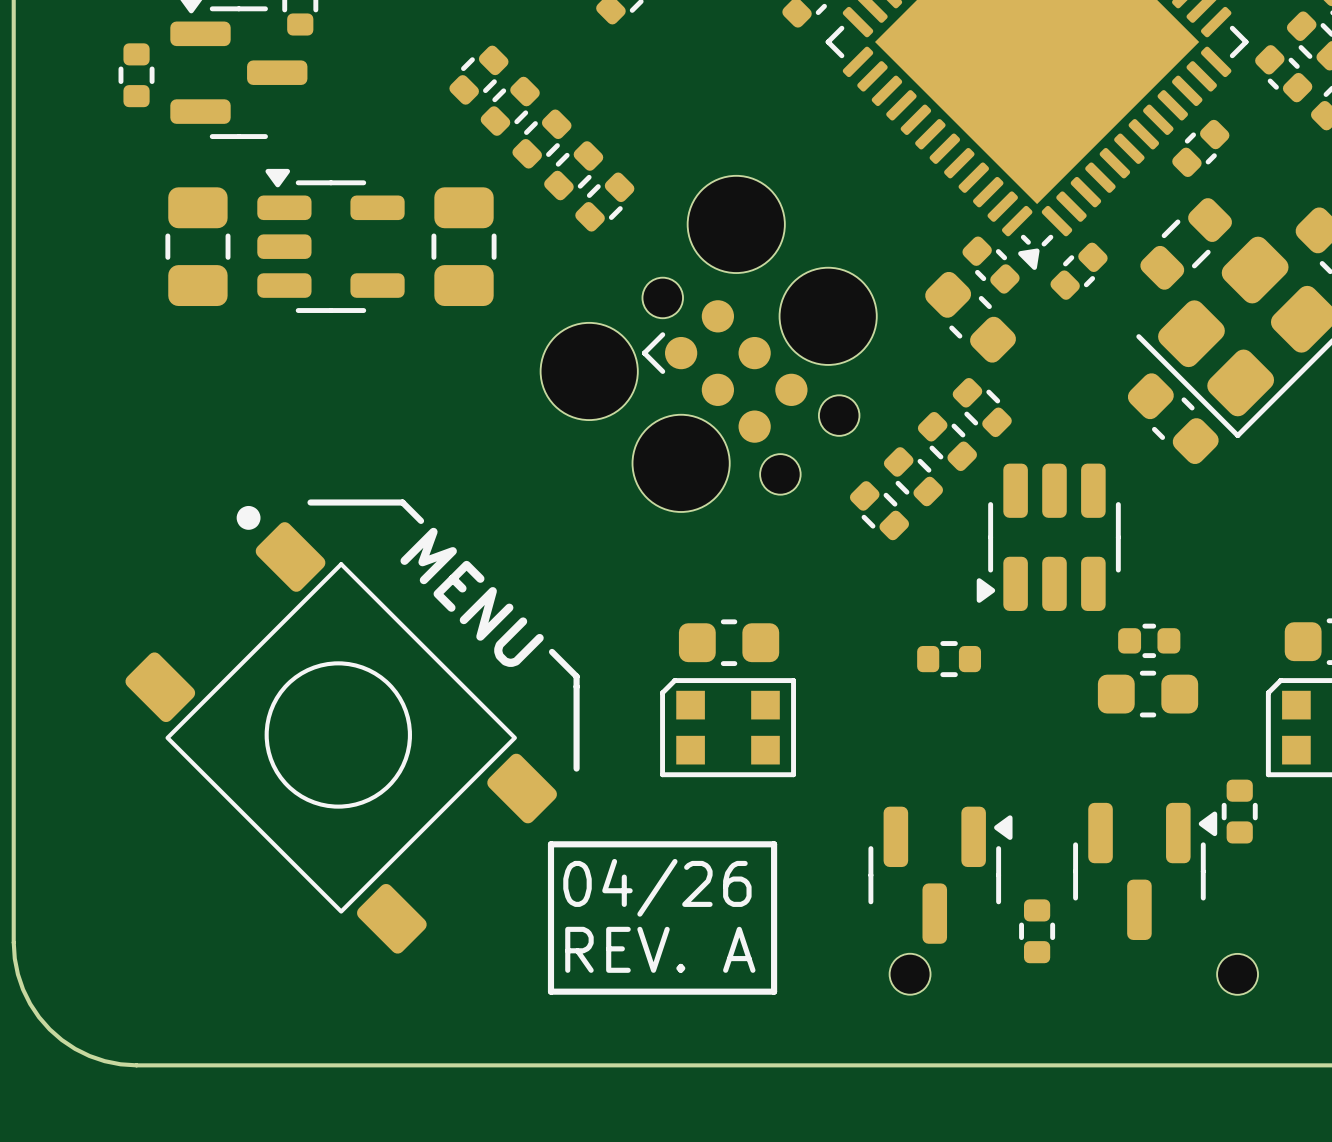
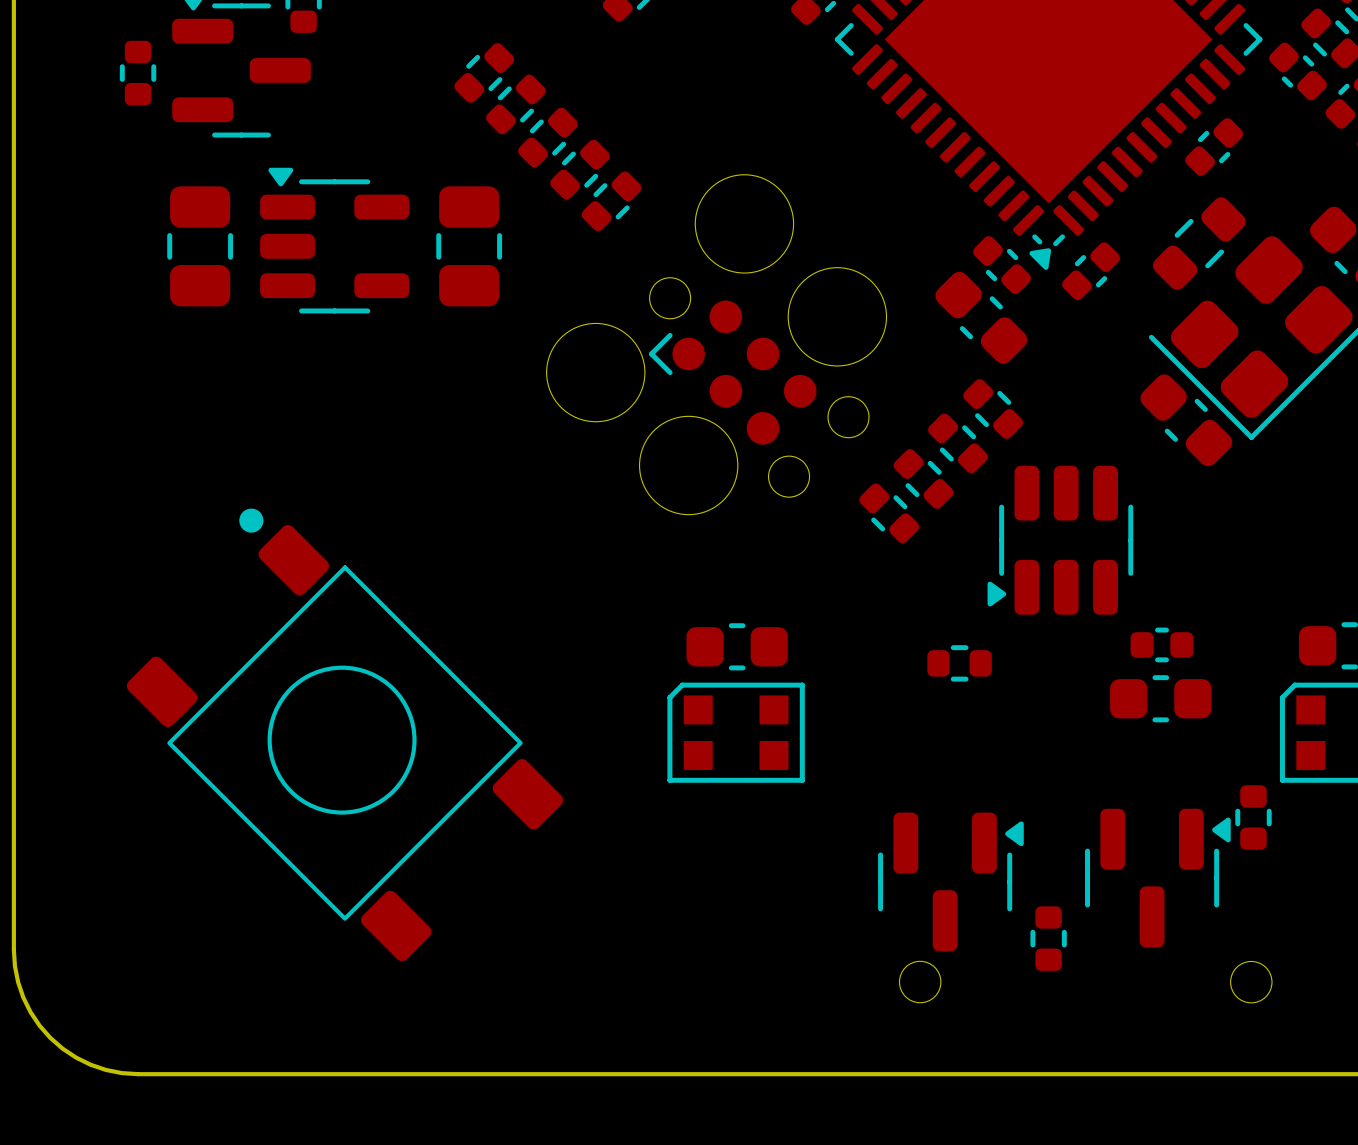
line: (310, 502) (402, 502) (421, 520) -> none
text: MENU (472, 597) -> none
line: (552, 651) (576, 676) (576, 768) -> none
line: (550, 844) (774, 844) (774, 991) (550, 991) (550, 844) -> none
text: 04/26 (657, 887) -> none
text: REV. A (660, 949) -> none

